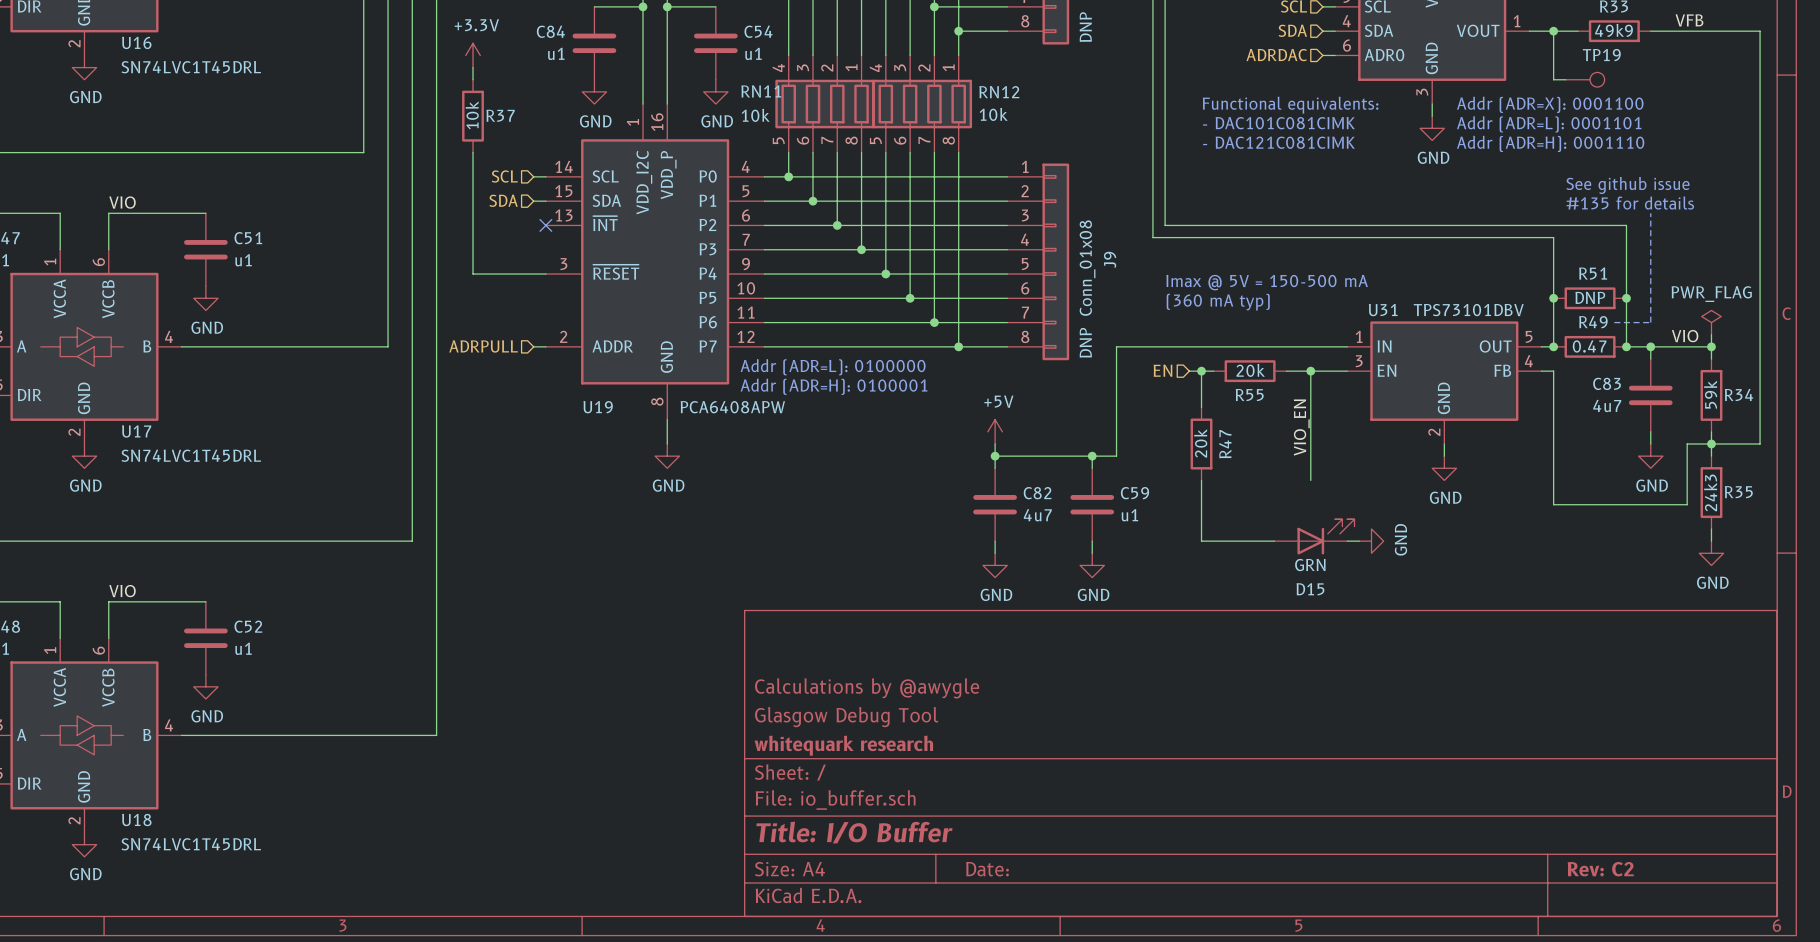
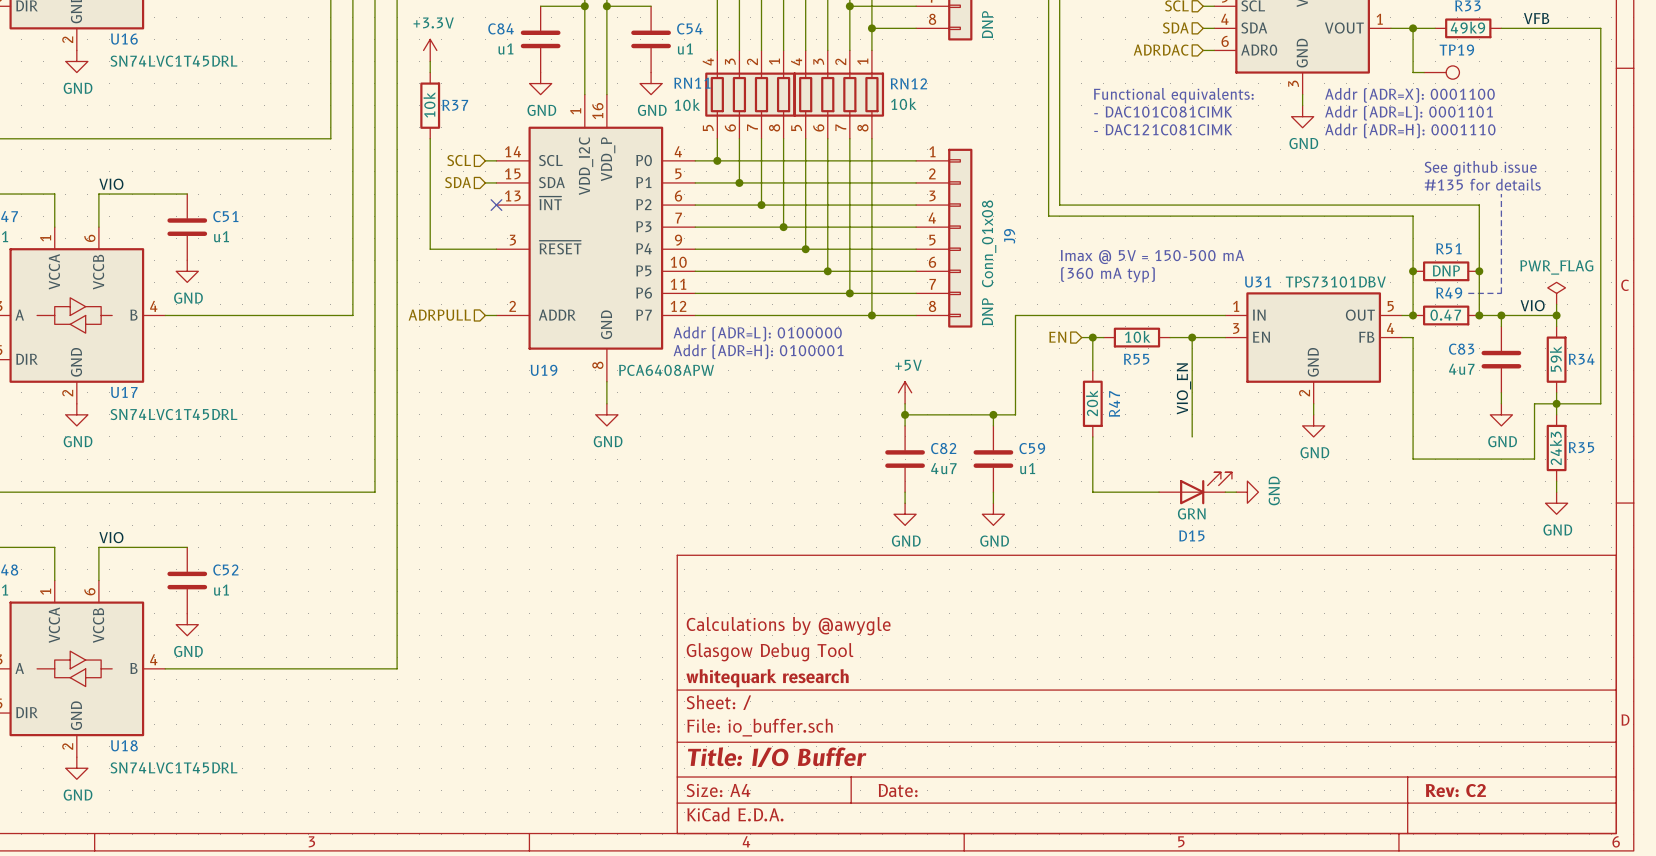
R55 value: 20k (1250, 370) -> 10k (1137, 336)

